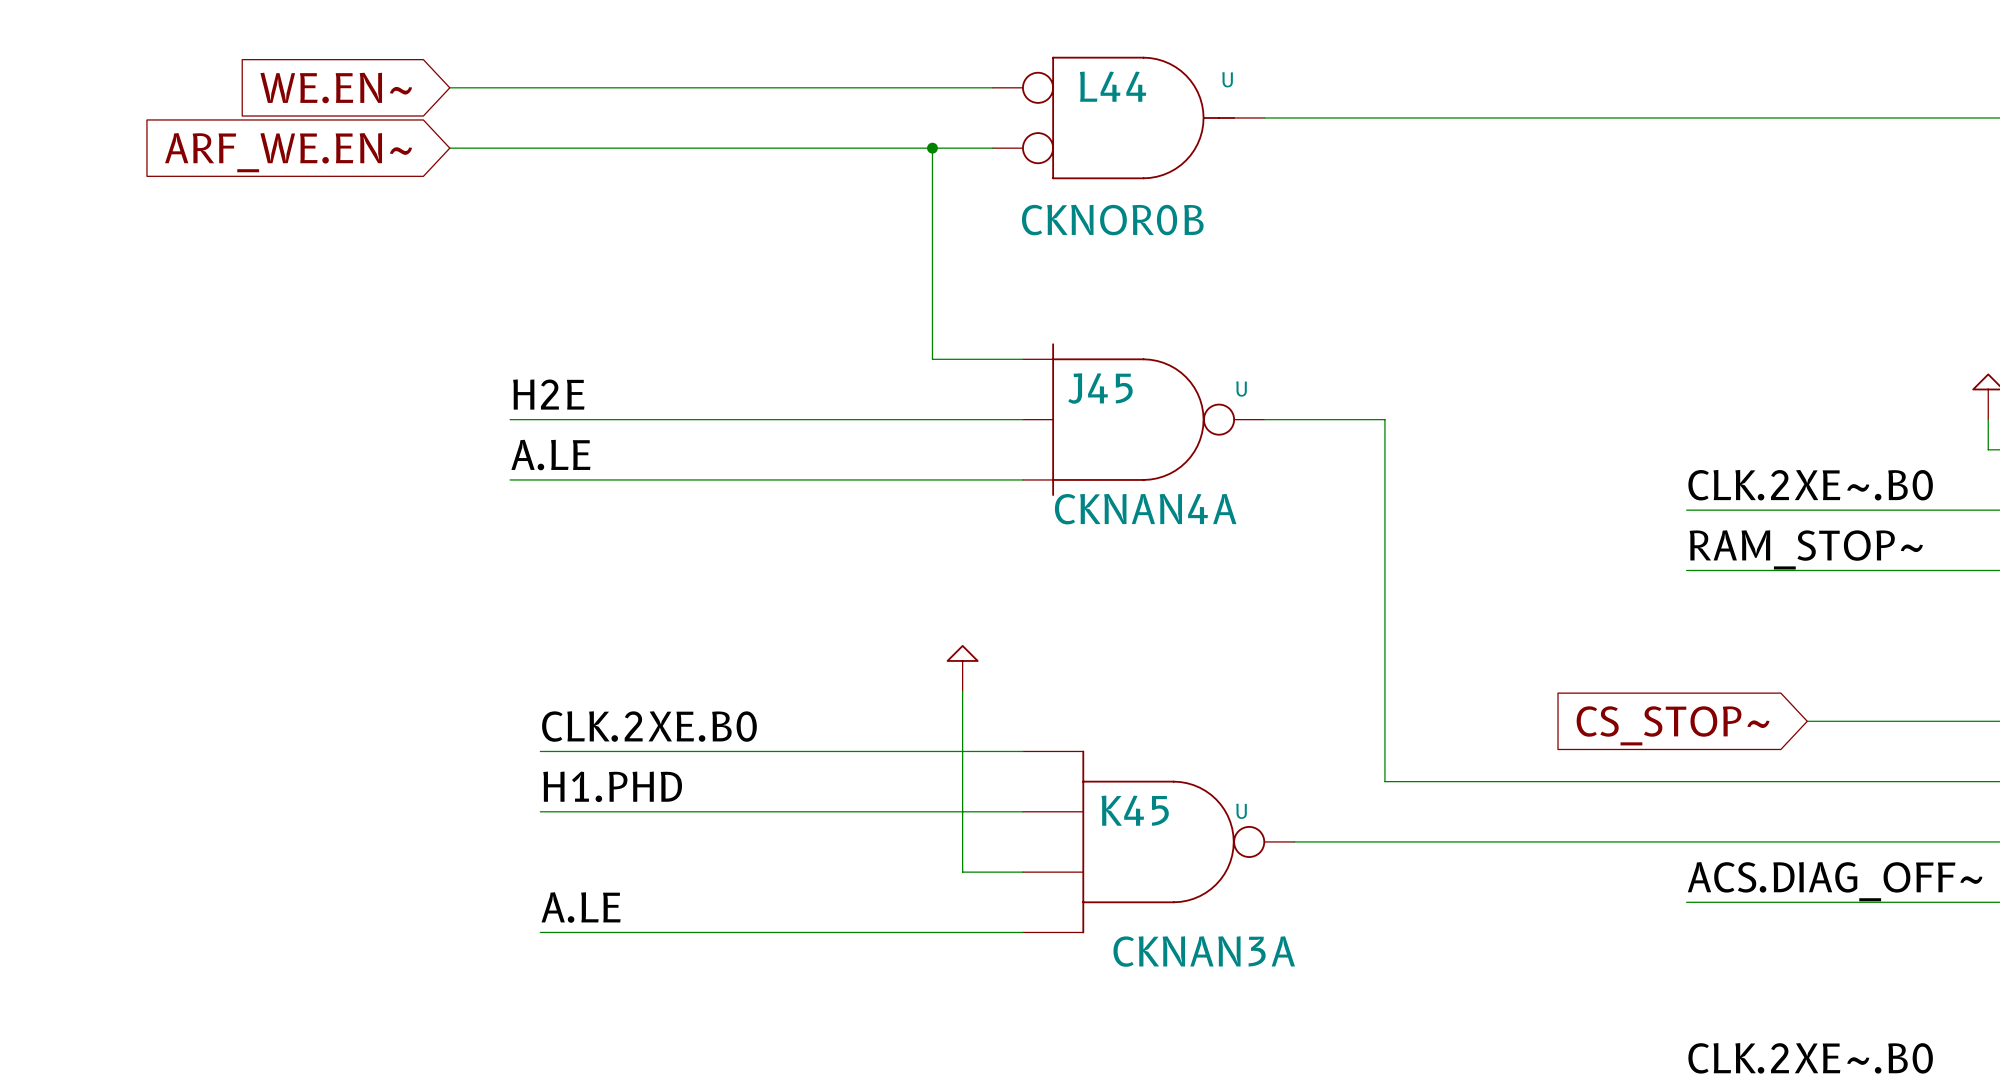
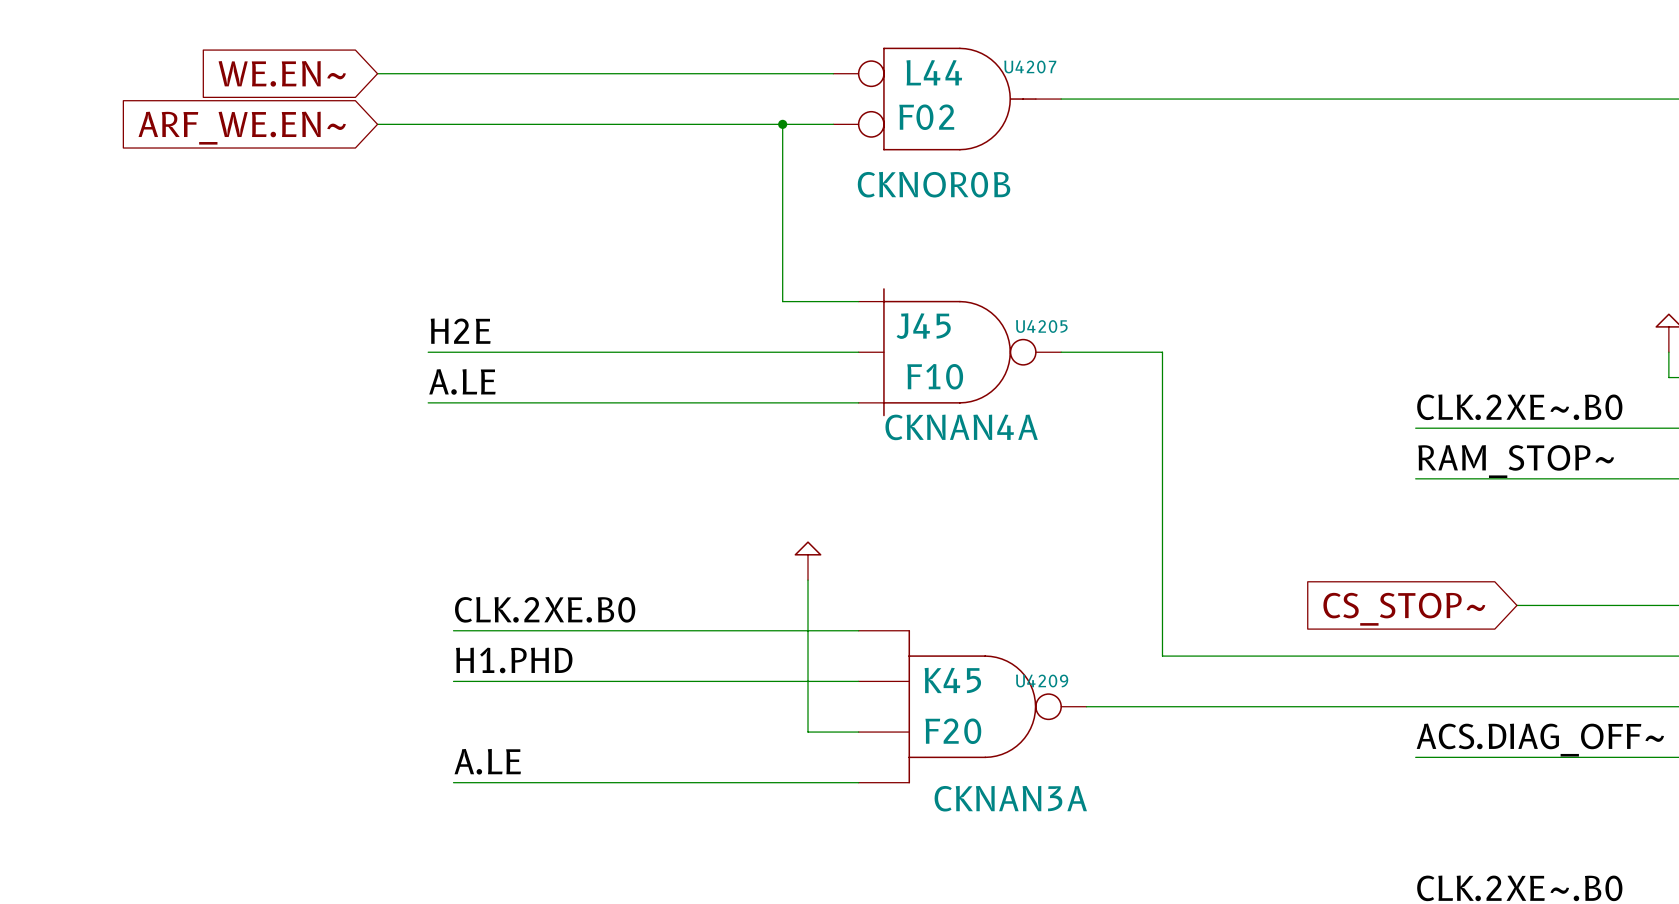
U name: U (1227, 79) -> U4207 (1030, 66)
U value: none -> F02 (926, 117)
U name: U (1241, 389) -> U4205 (1041, 326)
U value: none -> F10 (935, 376)
U name: U (1241, 811) -> U4209 (1042, 680)
U value: none -> F20 (953, 731)

